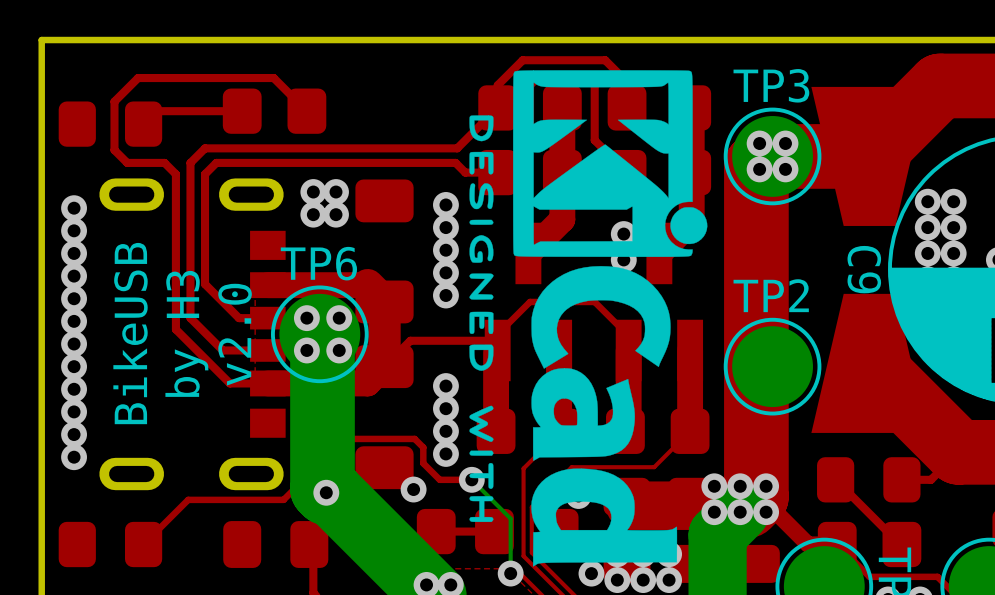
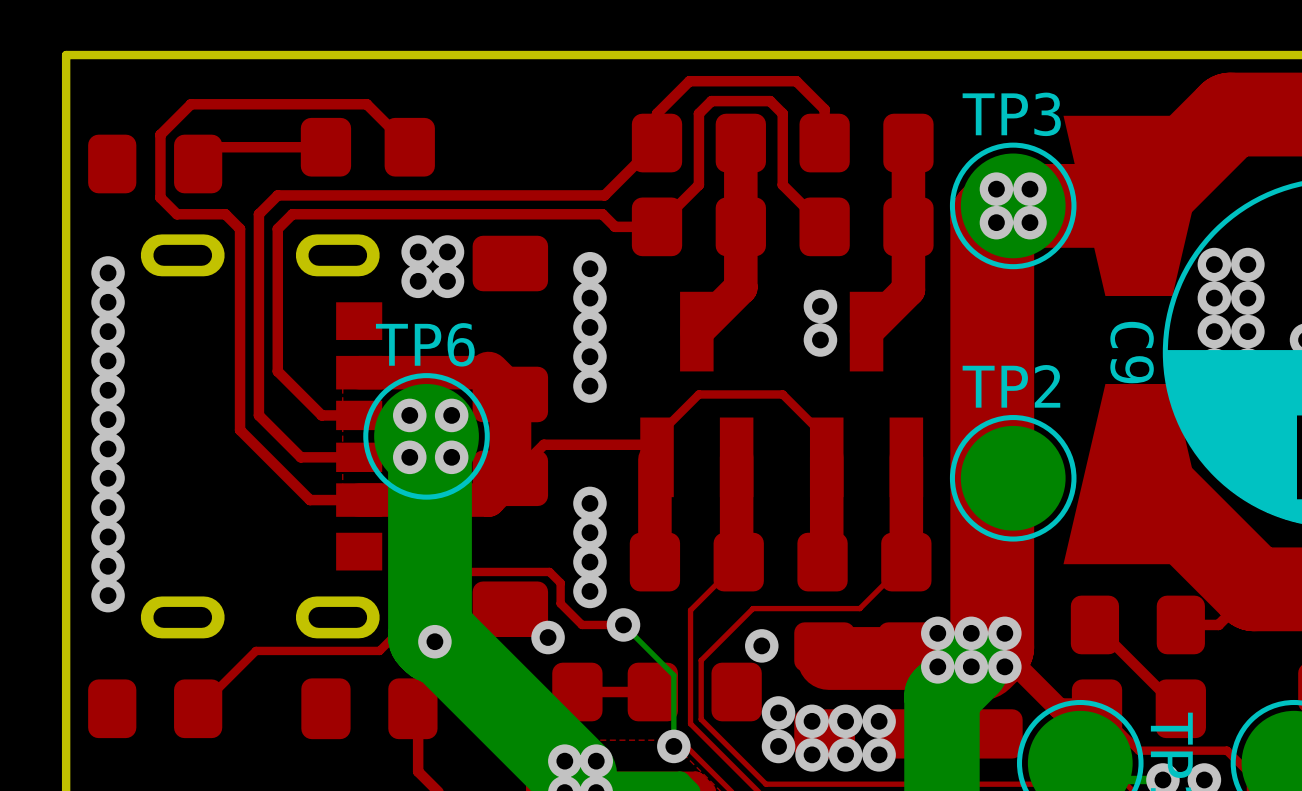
drawing: [469, 70, 708, 567] -> none
text: BikeUSB (130, 333) -> none
text: by H3 (186, 333) -> none
text: v2.0 (235, 334) -> none

